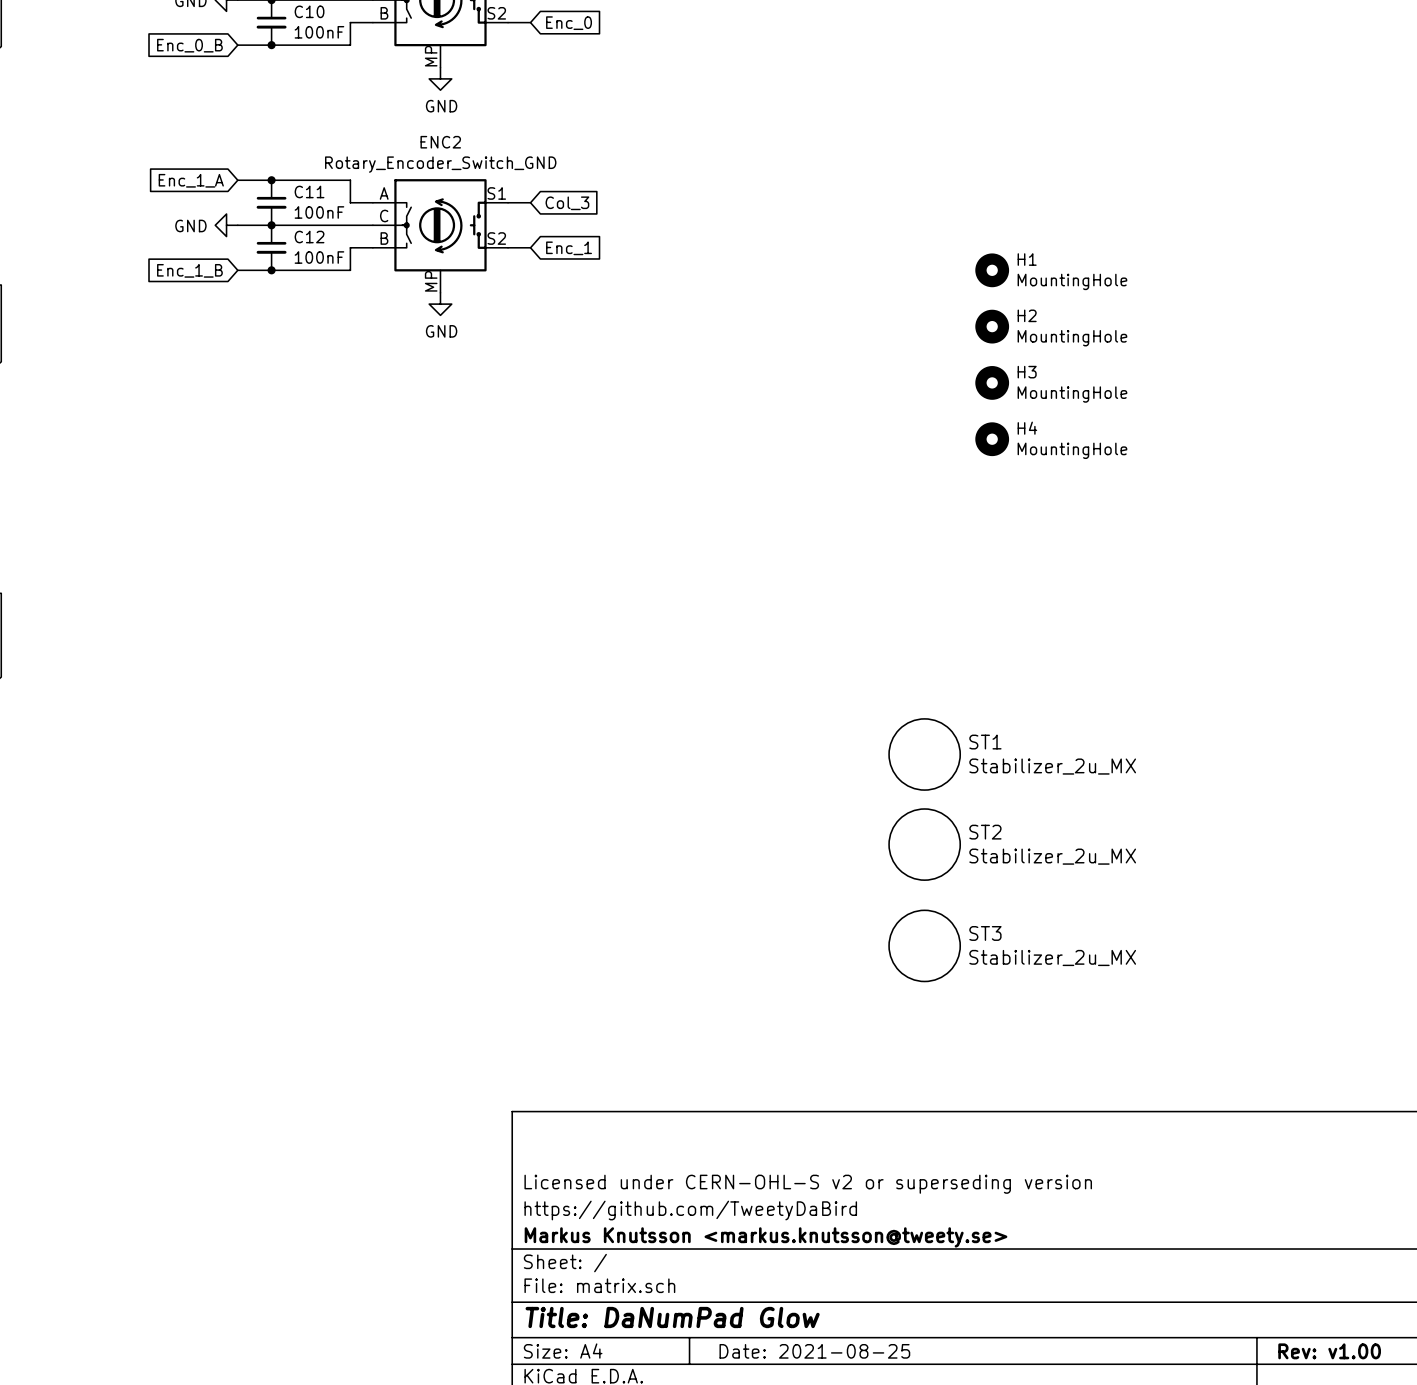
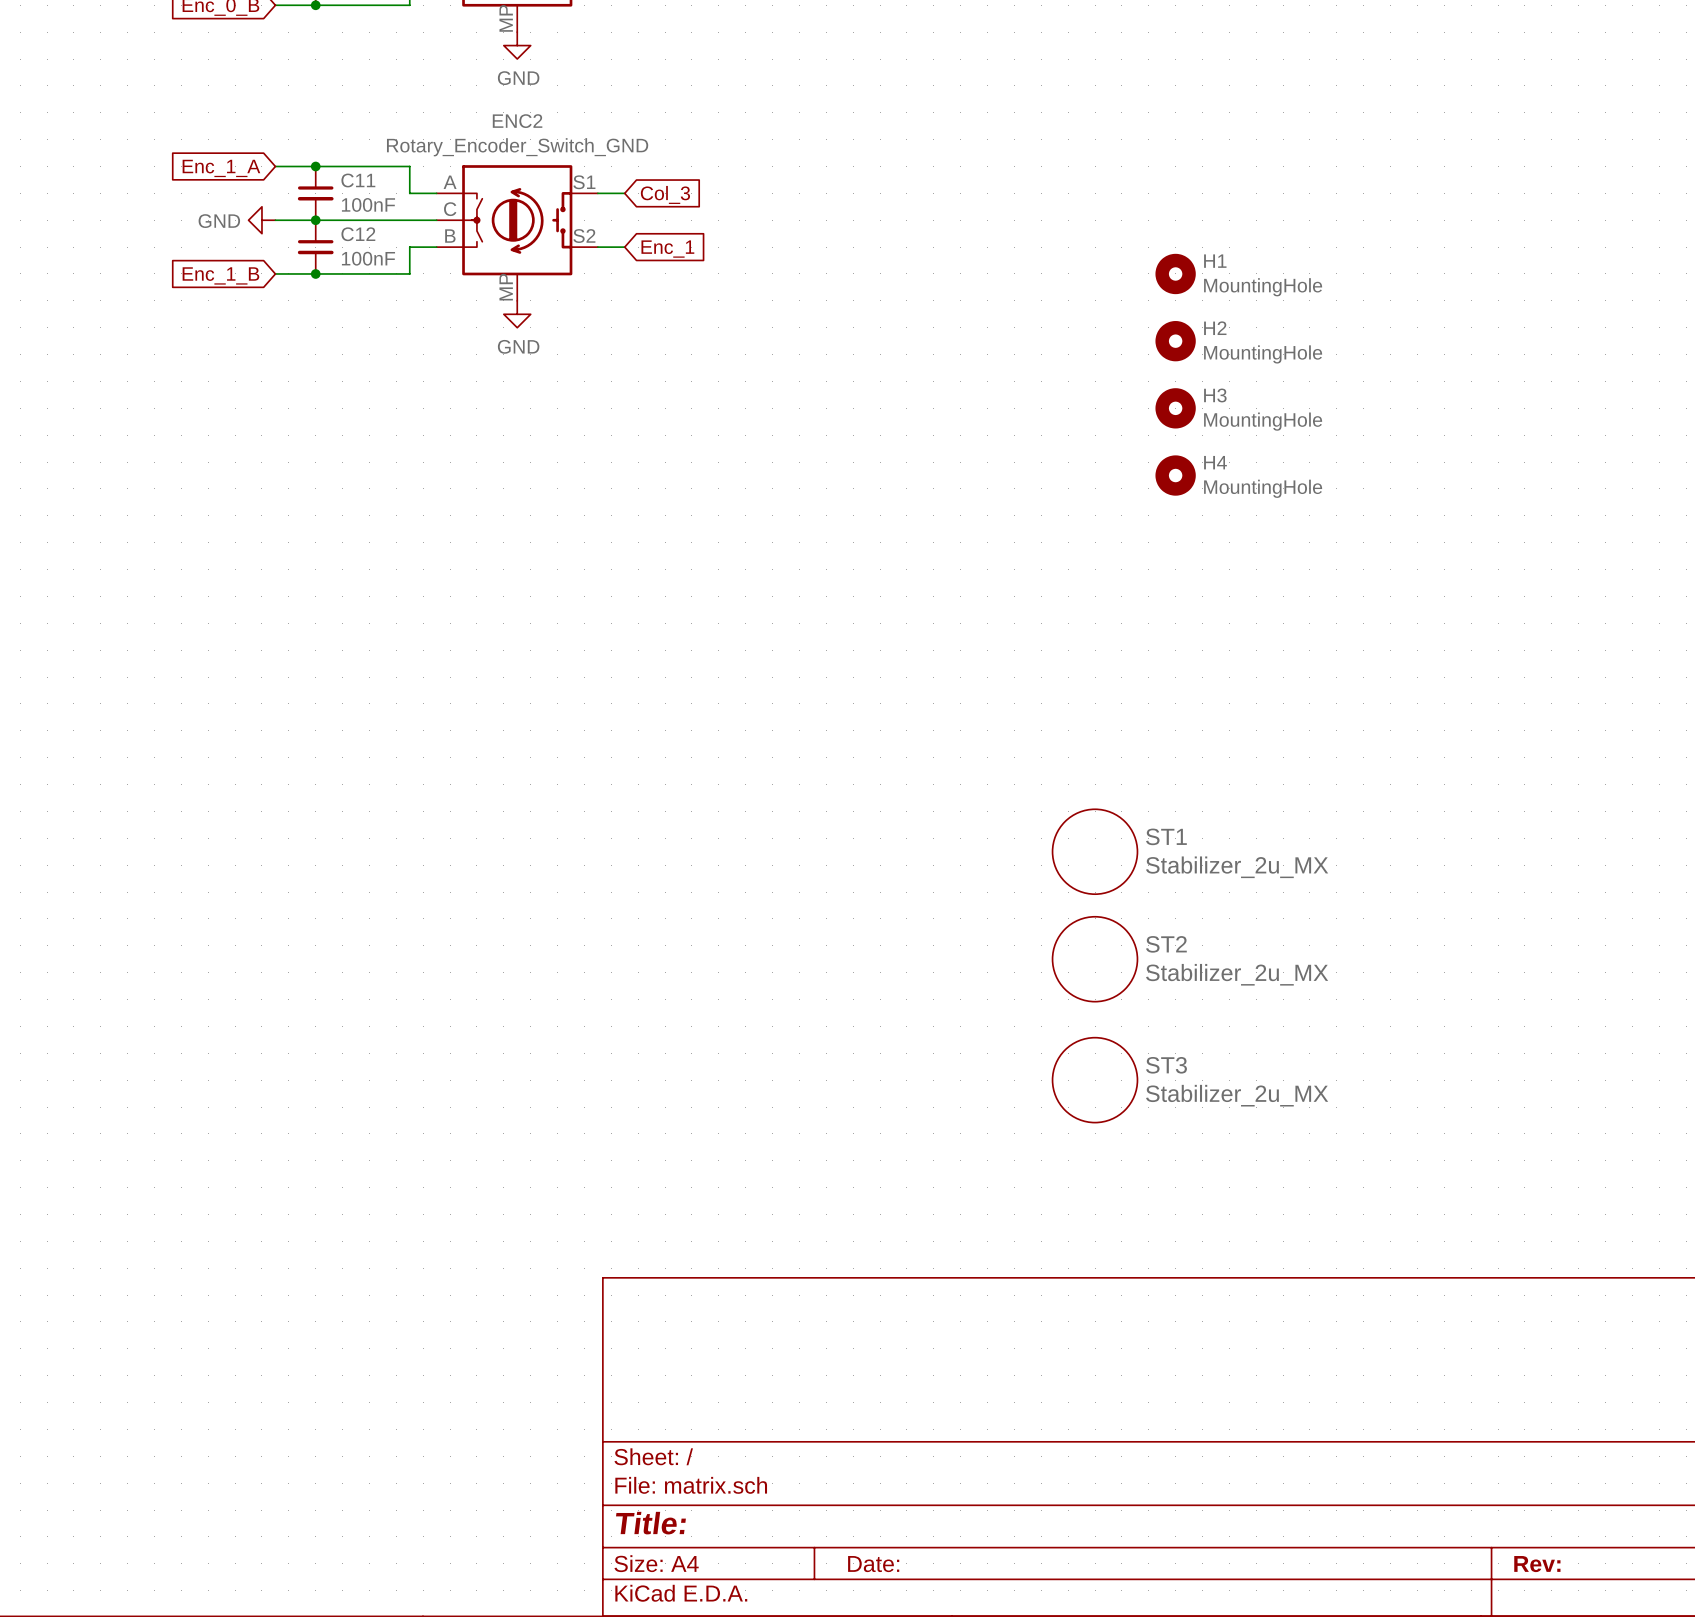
title block: Licensed under CERN-OHL-S v2 or superseding version (808, 1184) -> none
title block: https://github.com/TweetyDaBird (690, 1210) -> none
title block: Markus Knutsson <markus.knutsson@tweety.se> (766, 1237) -> none
title block: Title: DaNumPad Glow (672, 1317) -> Title: (650, 1523)
title block: Date: 2021-08-25 (814, 1351) -> Date: (873, 1564)
title block: Rev: v1.00 (1329, 1351) -> Rev: (1537, 1564)

